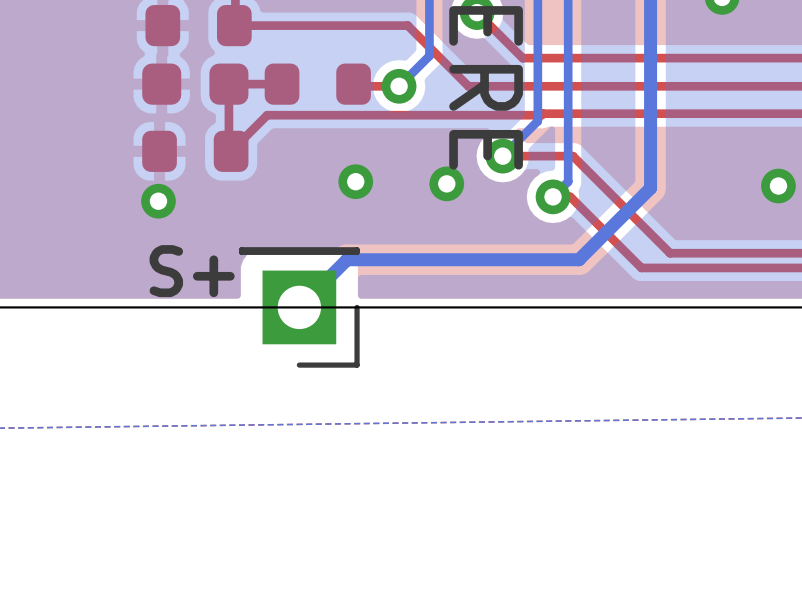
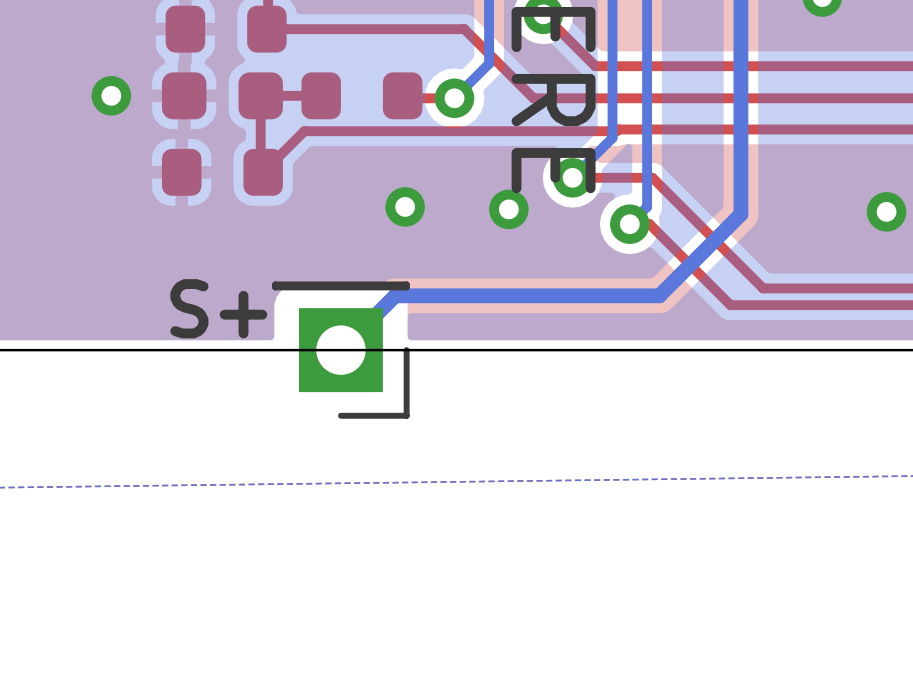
via: none -> (111, 95)
via: (158, 201) -> none

